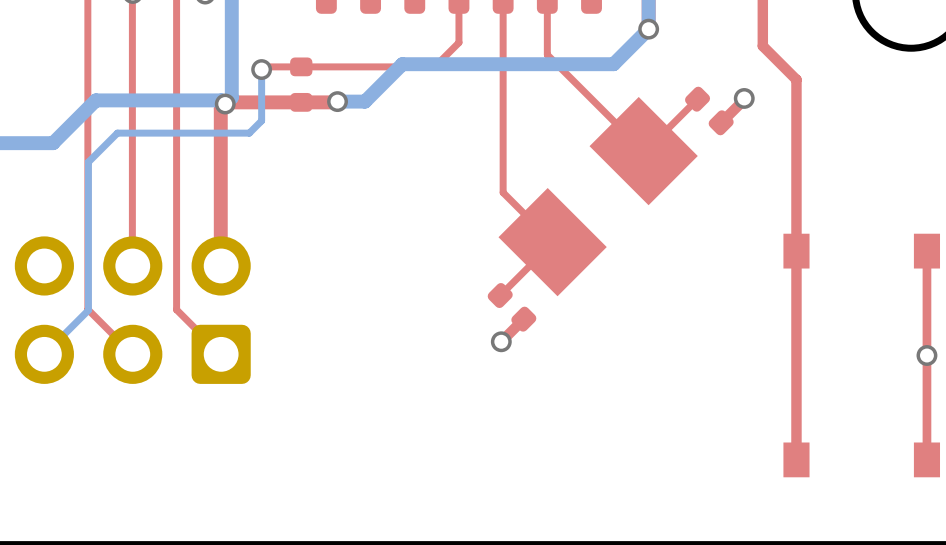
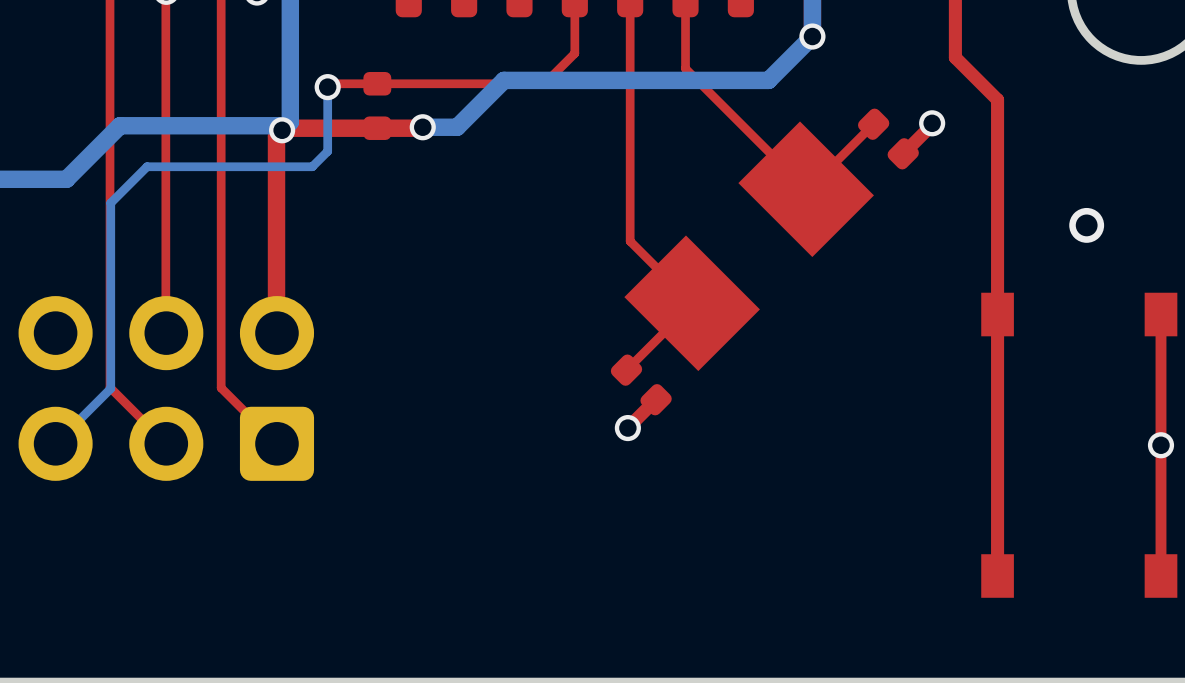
via: none -> (1086, 225)

